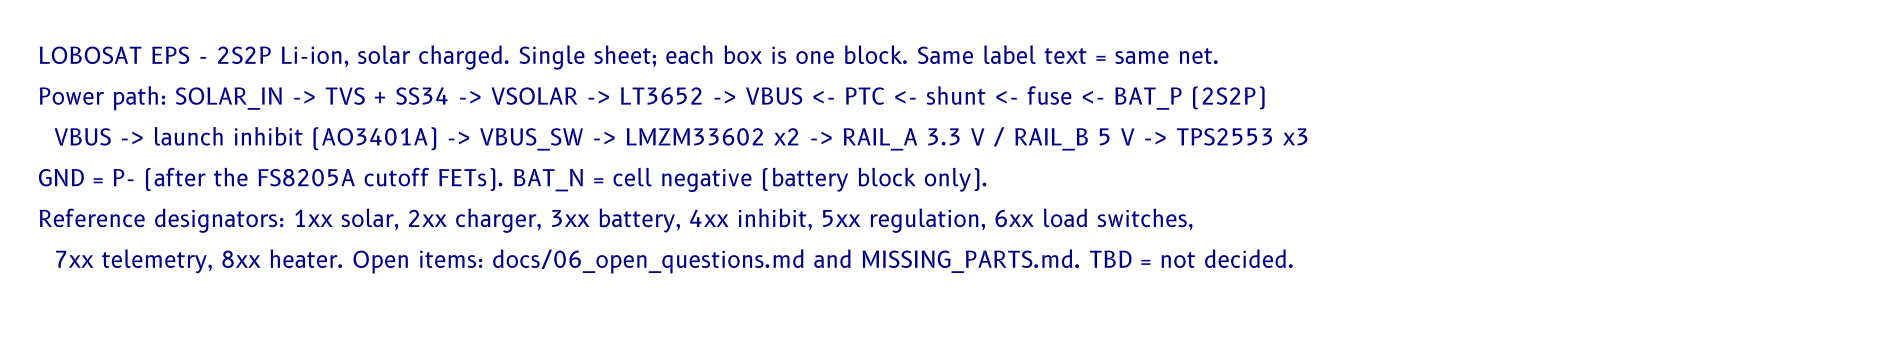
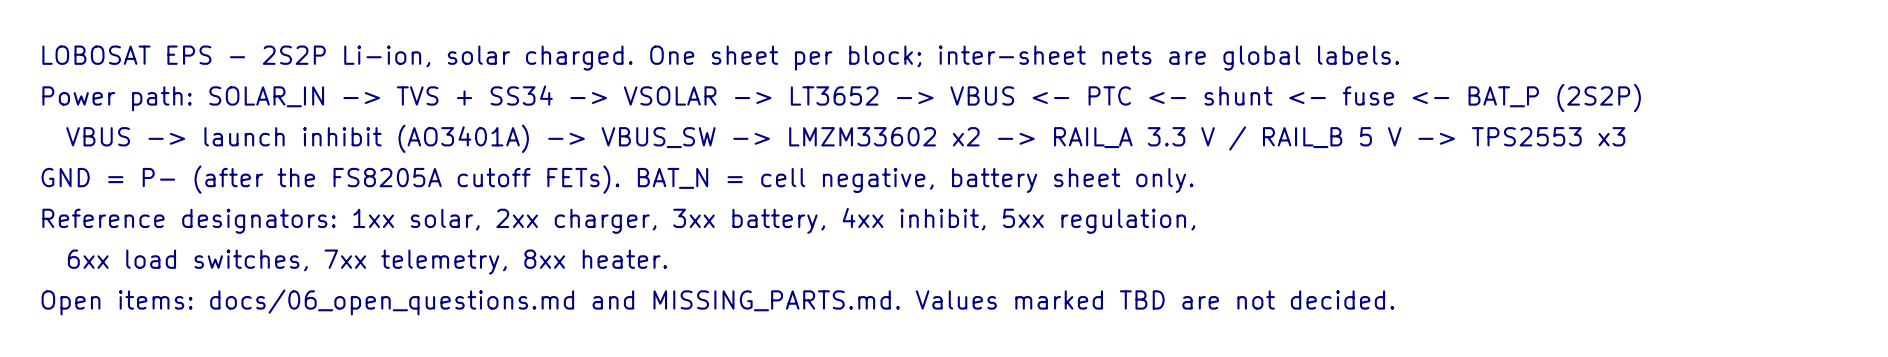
text: LOBOSAT EPS - 2S2P Li-ion, solar charged. Single sheet; each box is one block. Same label text = same net. (628, 57) -> LOBOSAT EPS - 2S2P Li-ion, solar charged. One sheet per block; inter-sheet nets are global labels. (720, 58)
text: GND = P- (after the FS8205A cutoff FETs). BAT_N = cell negative (battery block only). (512, 179) -> GND = P- (after the FS8205A cutoff FETs). BAT_N = cell negative, battery sheet only. (617, 179)
text: Reference designators: 1xx solar, 2xx charger, 3xx battery, 4xx inhibit, 5xx regulation, 6xx load switches, (616, 220) -> Reference designators: 1xx solar, 2xx charger, 3xx battery, 4xx inhibit, 5xx regulation, (618, 220)
text: 7xx telemetry, 8xx heater. Open items: docs/06_open_questions.md and MISSING_PARTS.md. TBD = not decided. (674, 261) -> 6xx load switches, 7xx telemetry, 8xx heater. (367, 262)
text: none -> Open items: docs/06_open_questions.md and MISSING_PARTS.md. Values marked TBD are not decided. (717, 302)

